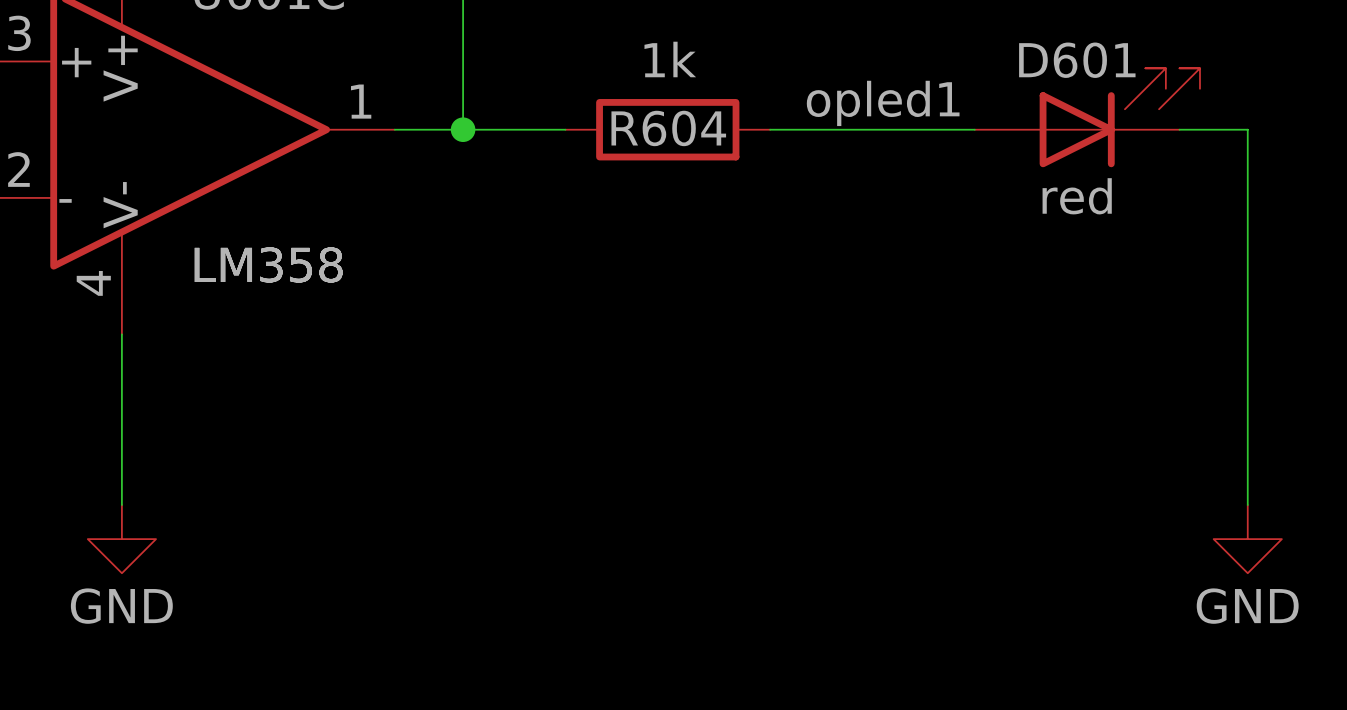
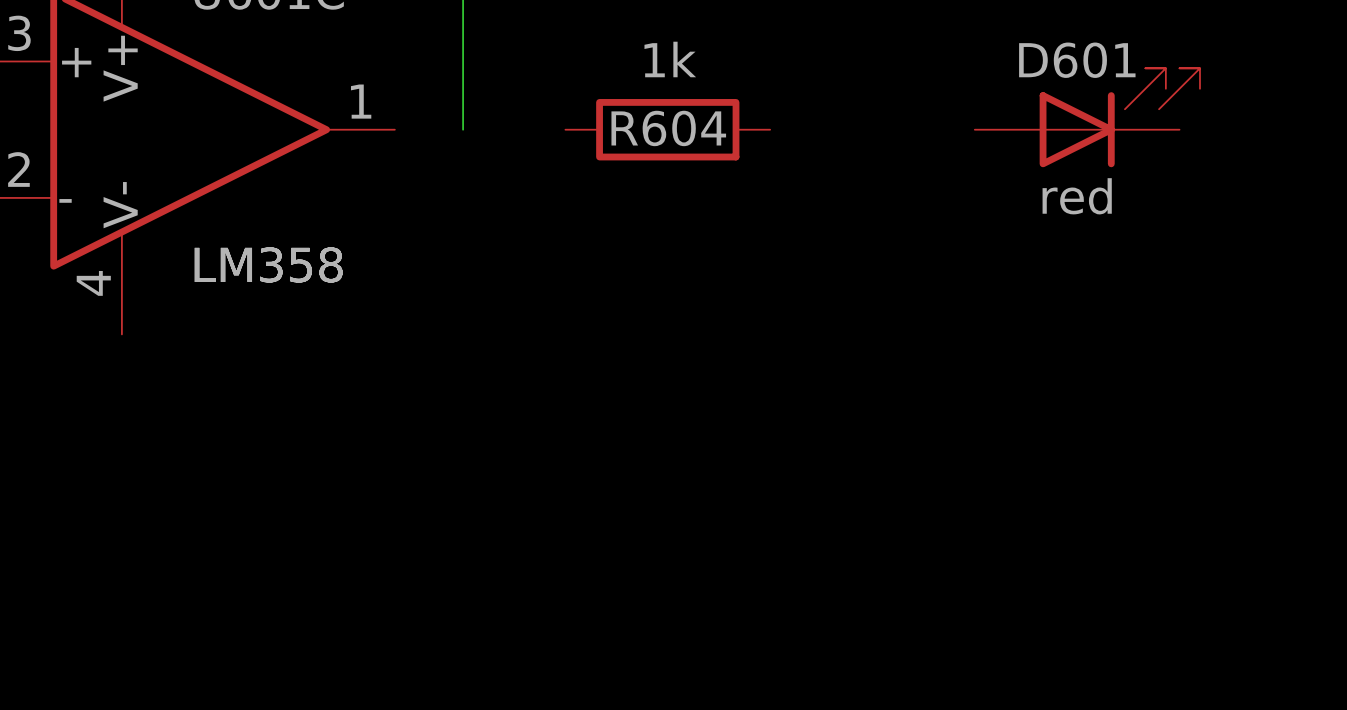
label: opled1 (883, 103) -> none
wire: (394, 129) (565, 129) -> none
junction: (463, 129) -> none
wire: (770, 129) (974, 129) -> none
wire: (1179, 129) (1247, 129) (1247, 504) -> none
wire: (121, 334) (121, 504) -> none
power symbol: GND (121, 539) -> none
power symbol: GND (1247, 539) -> none

